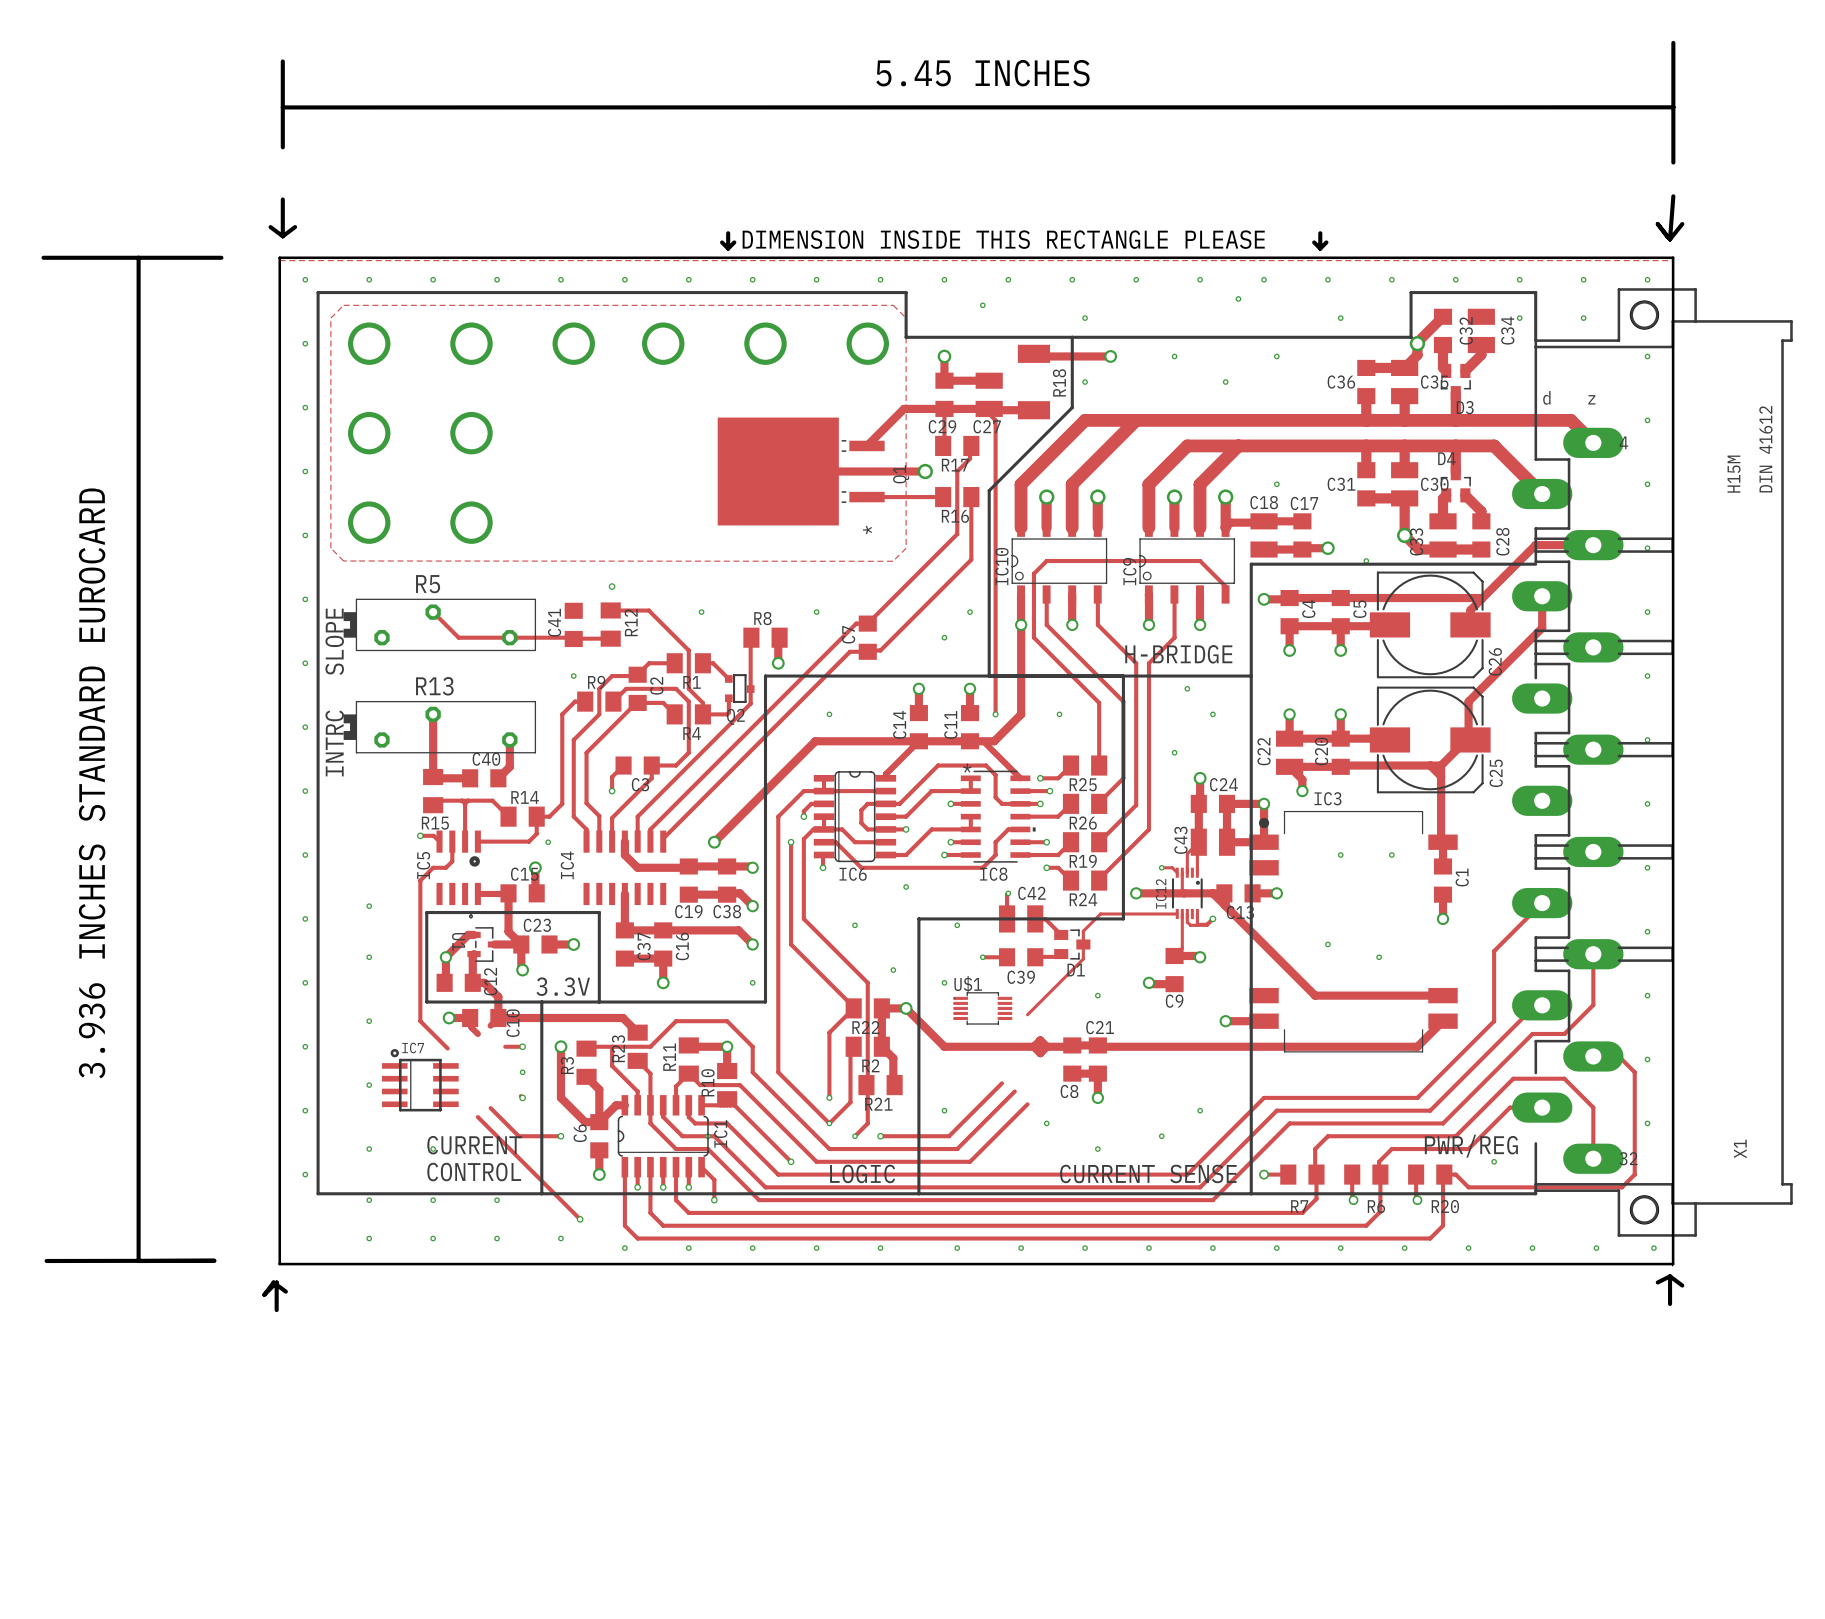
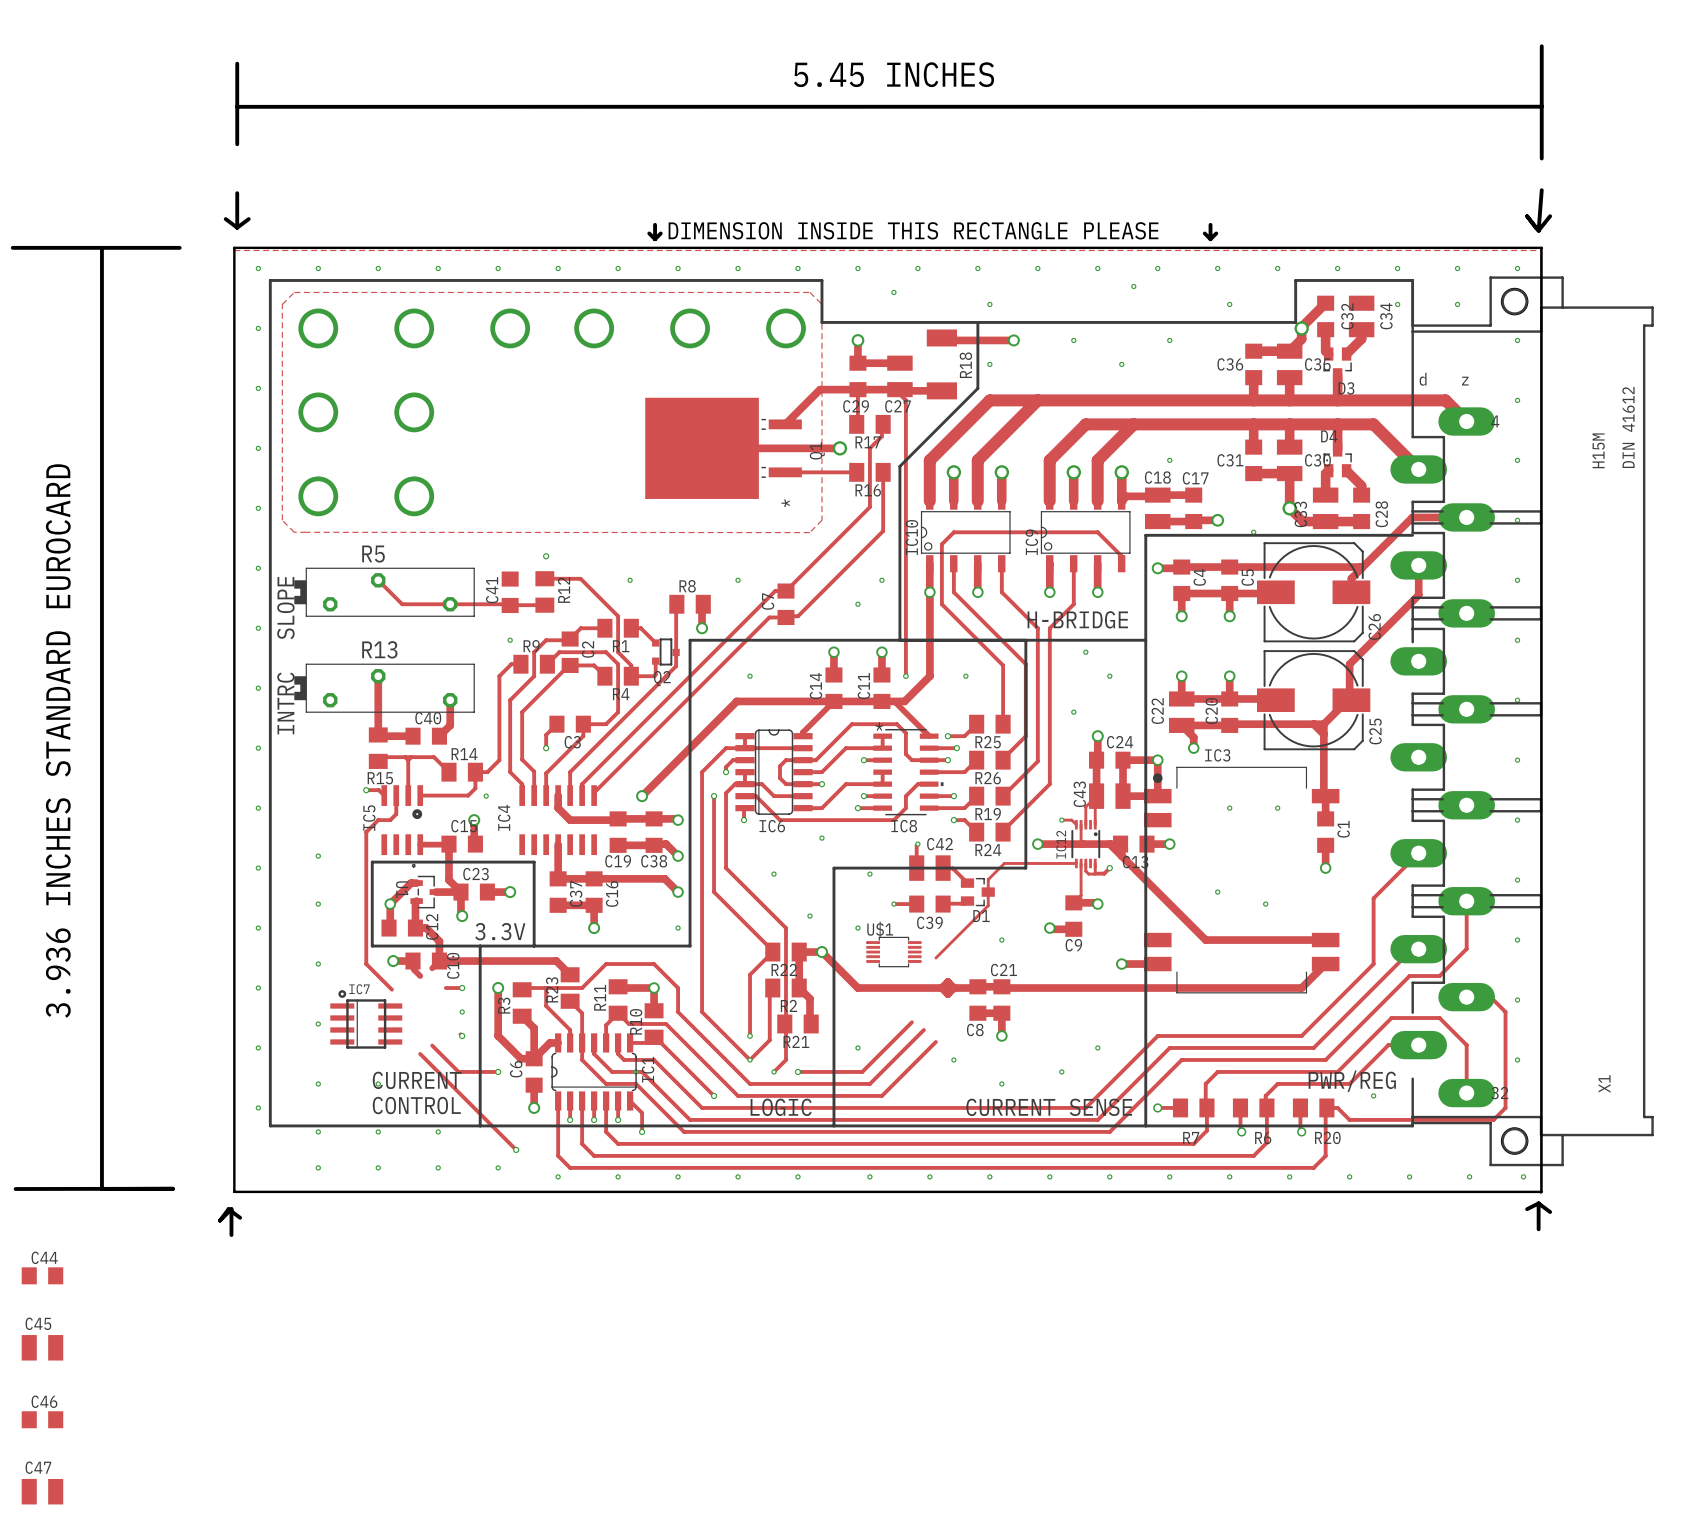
C44: none -> (42, 1275)
C45: none -> (42, 1347)
C46: none -> (42, 1419)
C47: none -> (42, 1491)

